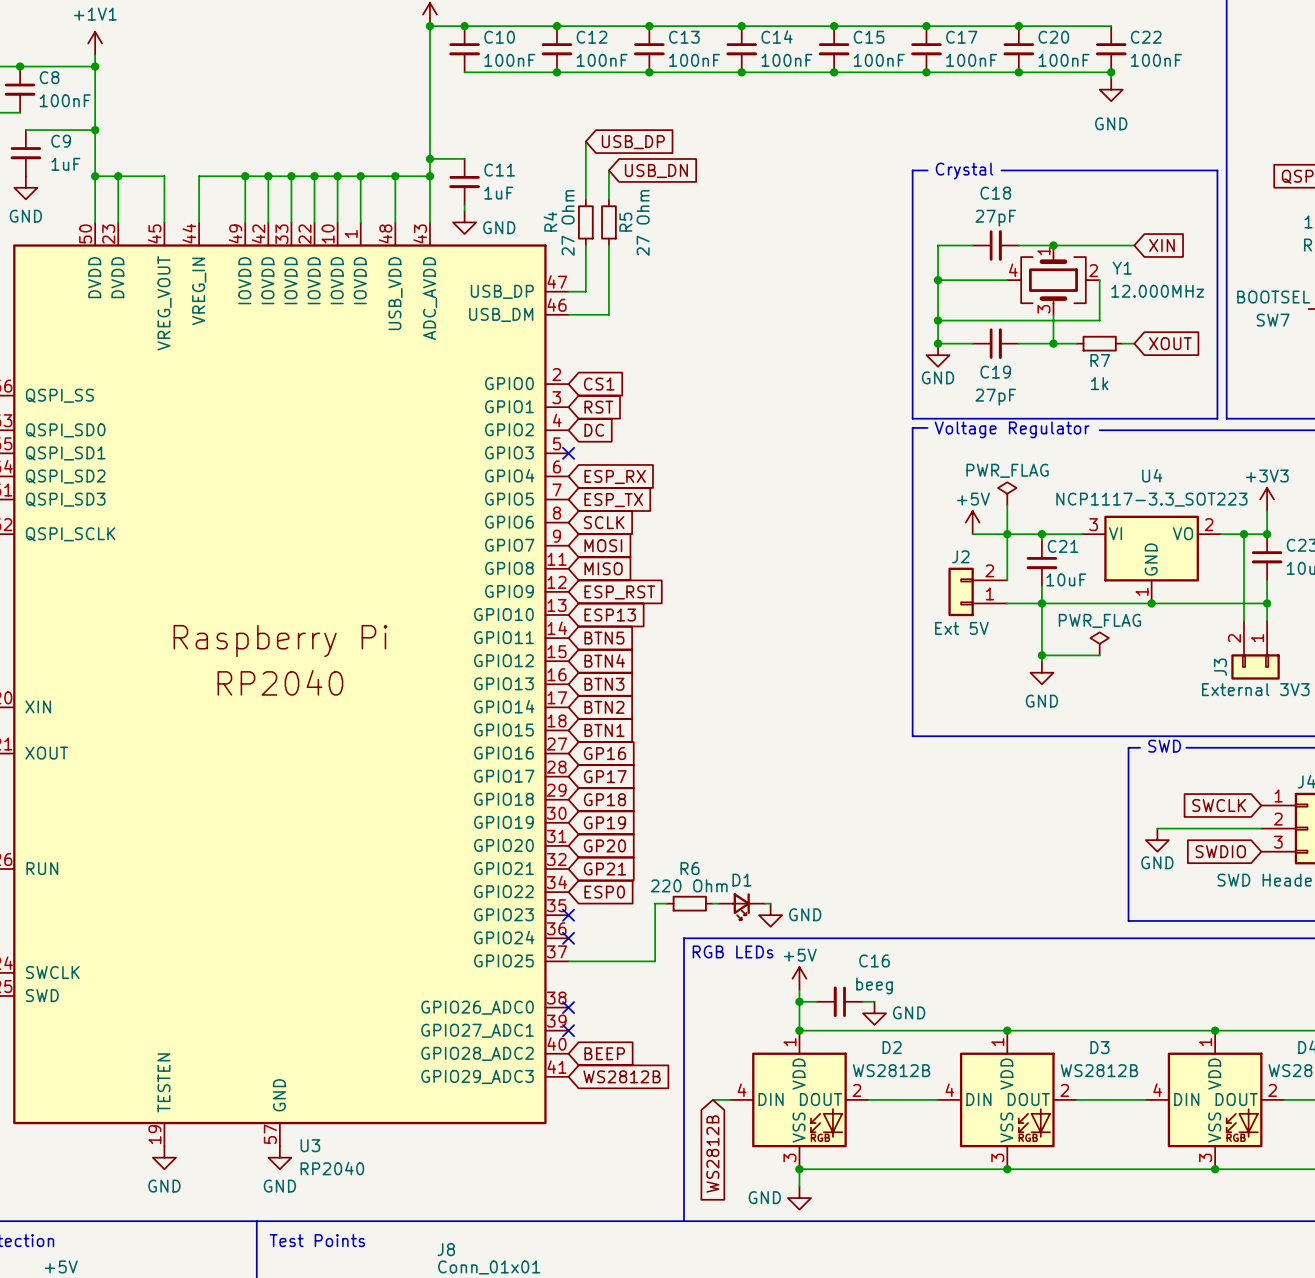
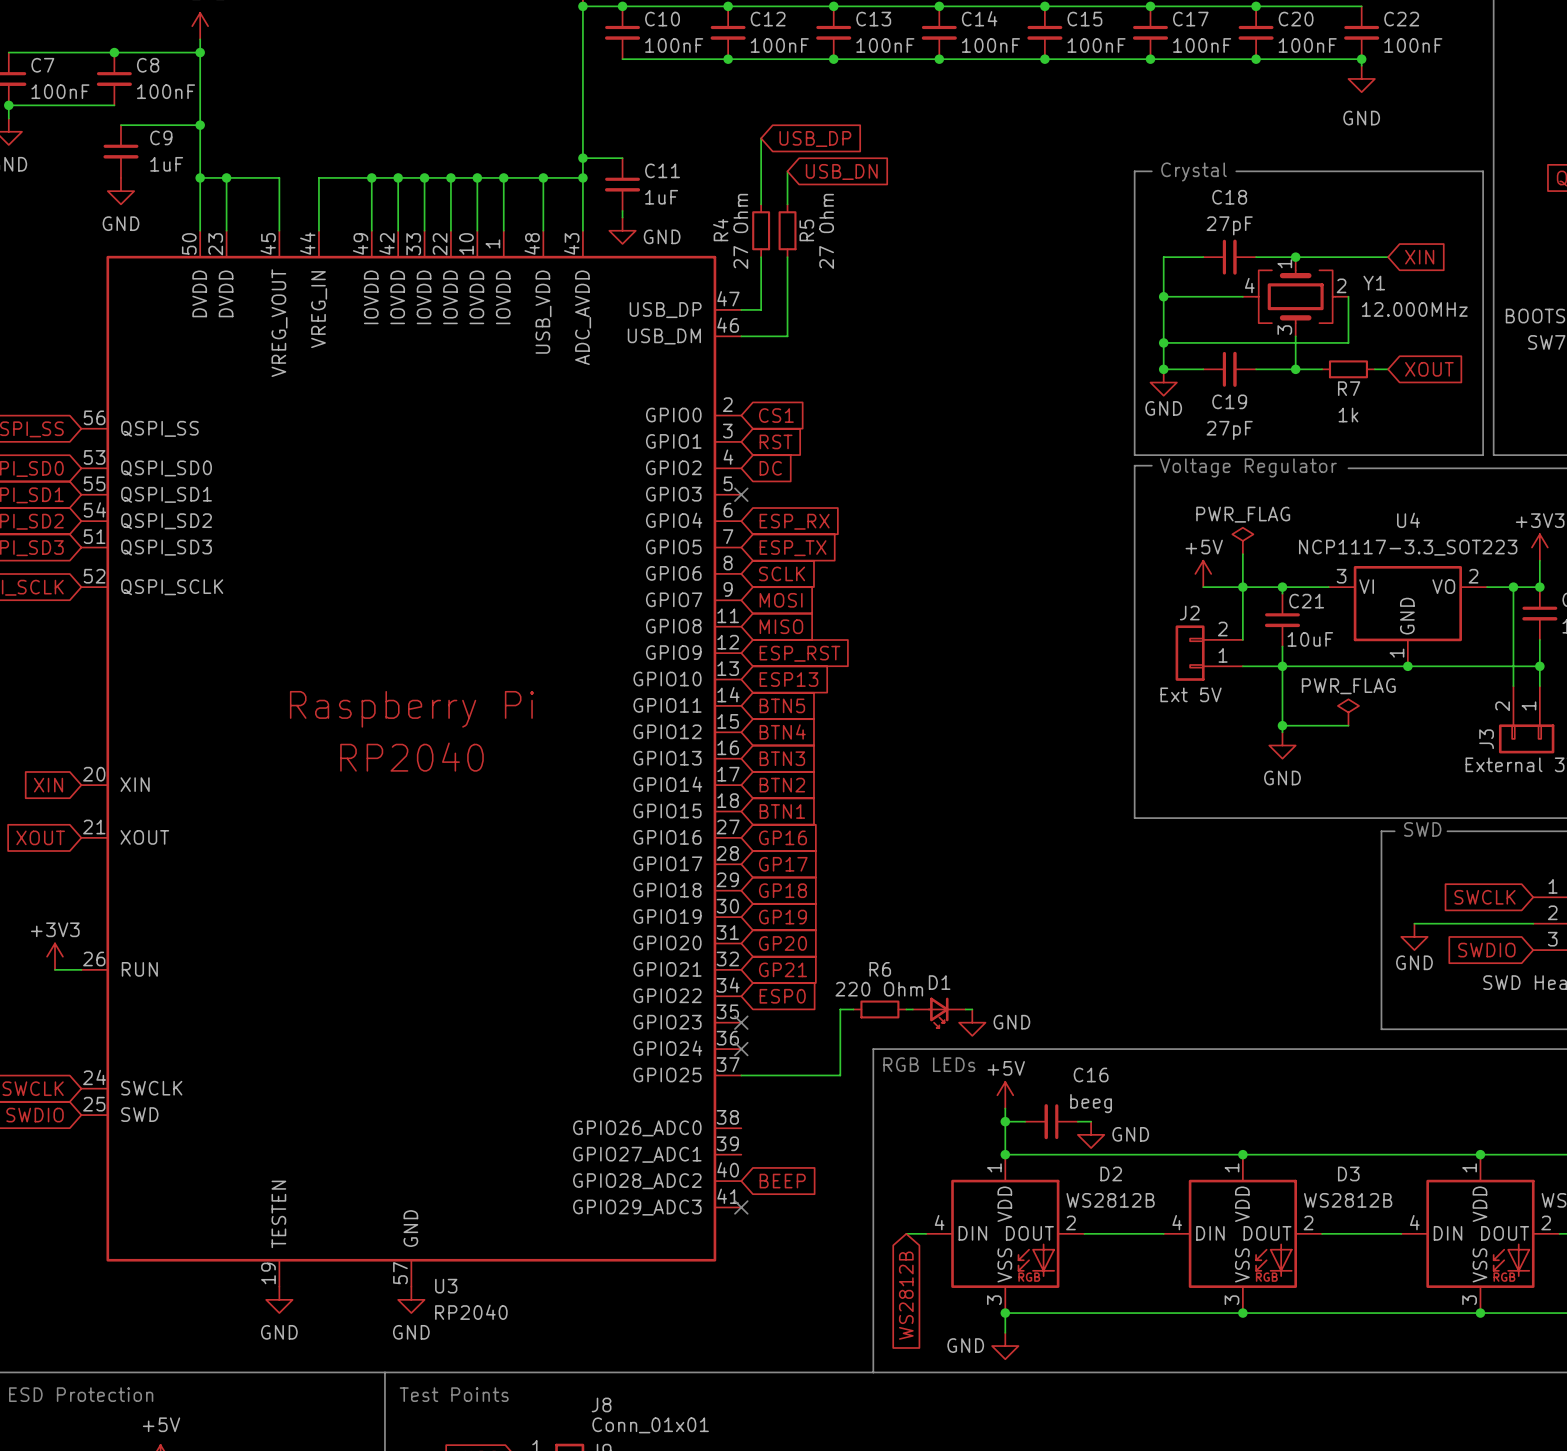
no-connect mark: (568, 1007) -> none
no-connect mark: (568, 1030) -> none
no-connect mark: none -> (741, 1207)
global label: WS2812B (622, 1076) -> none

